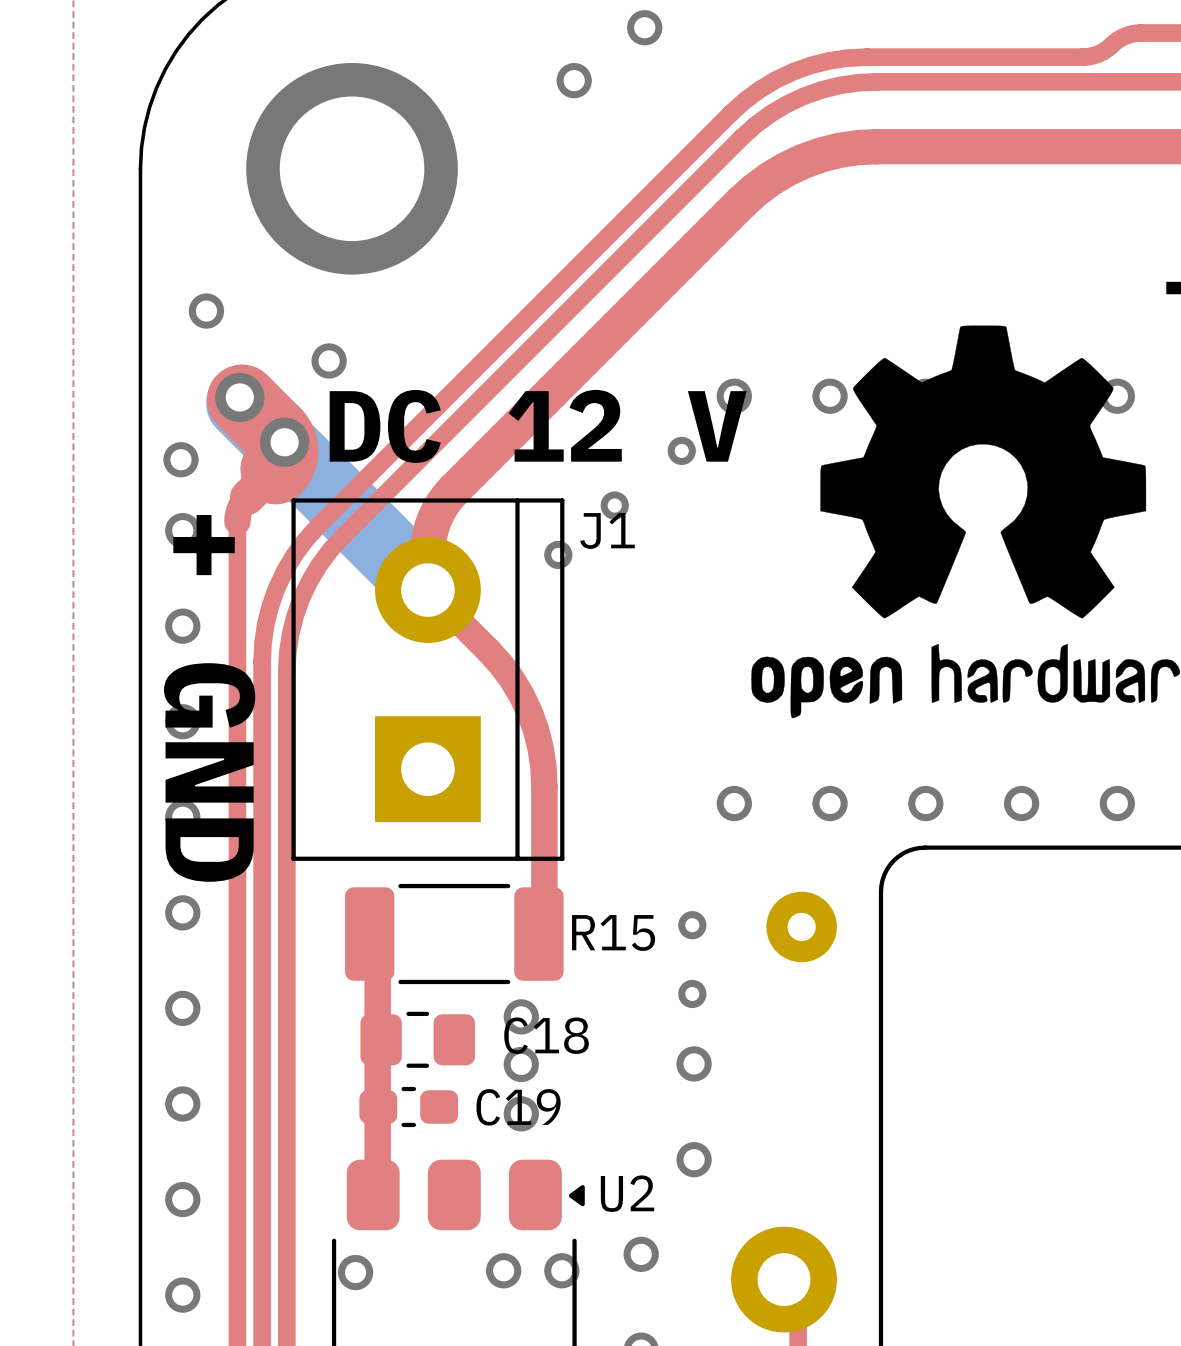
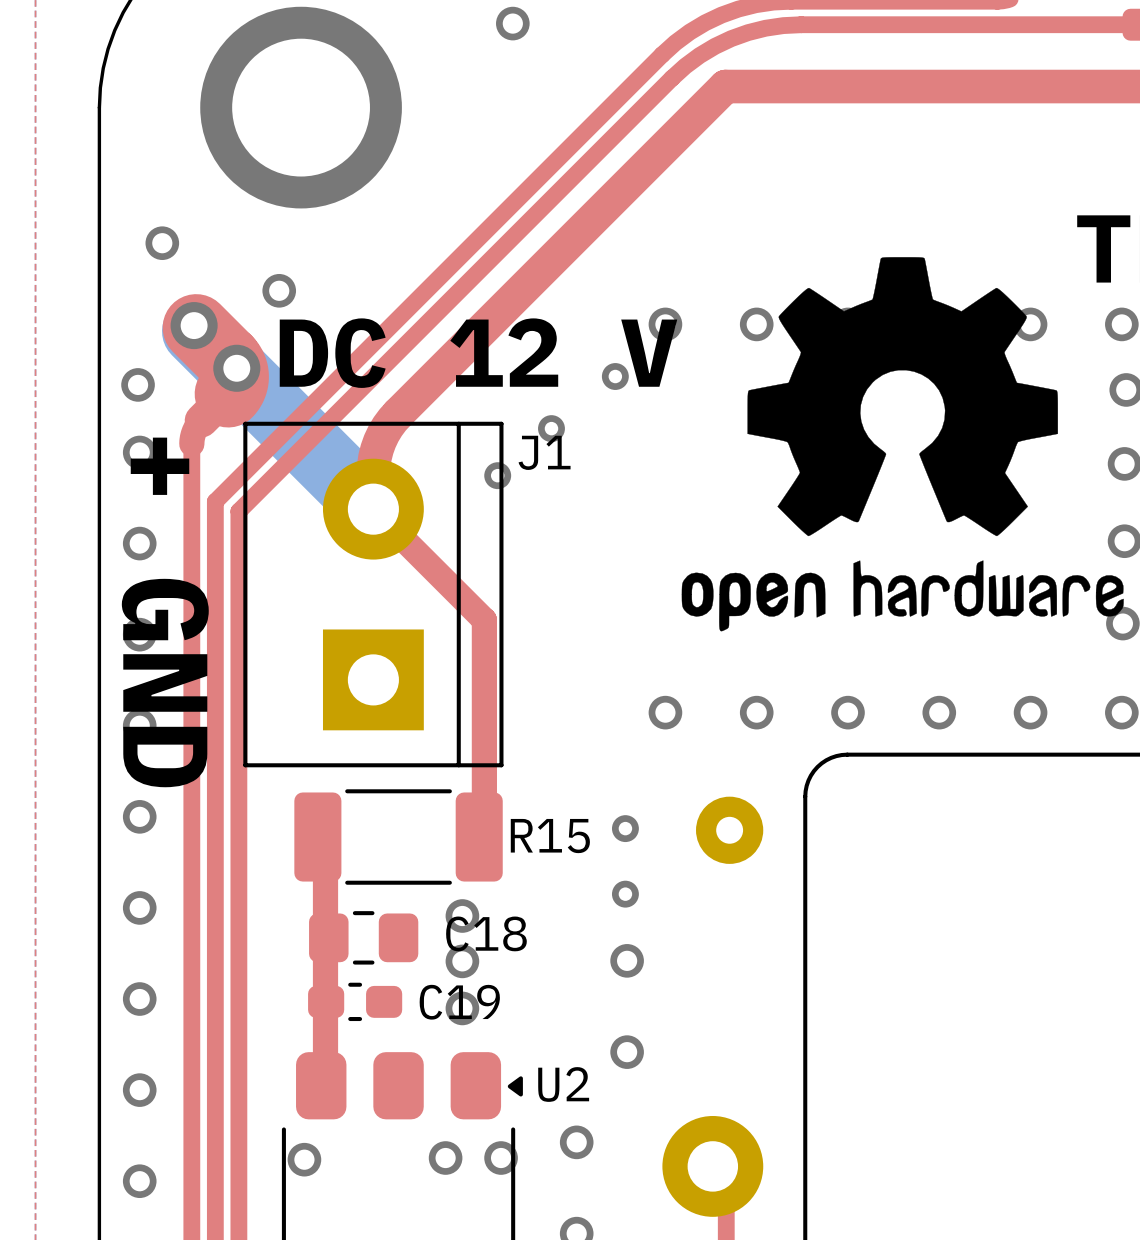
top track: (876, 146) (839, 150) (803, 161) (770, 179) (741, 202) -> (801, 86) (725, 86) (671, 140)
top track: (318, 525) (294, 555) (276, 588) (265, 624) (262, 661) -> (268, 448) (215, 501) (215, 577)
top track: (343, 536) (319, 565) (301, 598) (290, 634) (286, 671) -> (292, 457) (238, 511) (238, 587)
top track: (488, 650) (512, 679) (529, 712) (540, 748) (544, 785) -> (430, 566) (484, 620) (484, 695)

